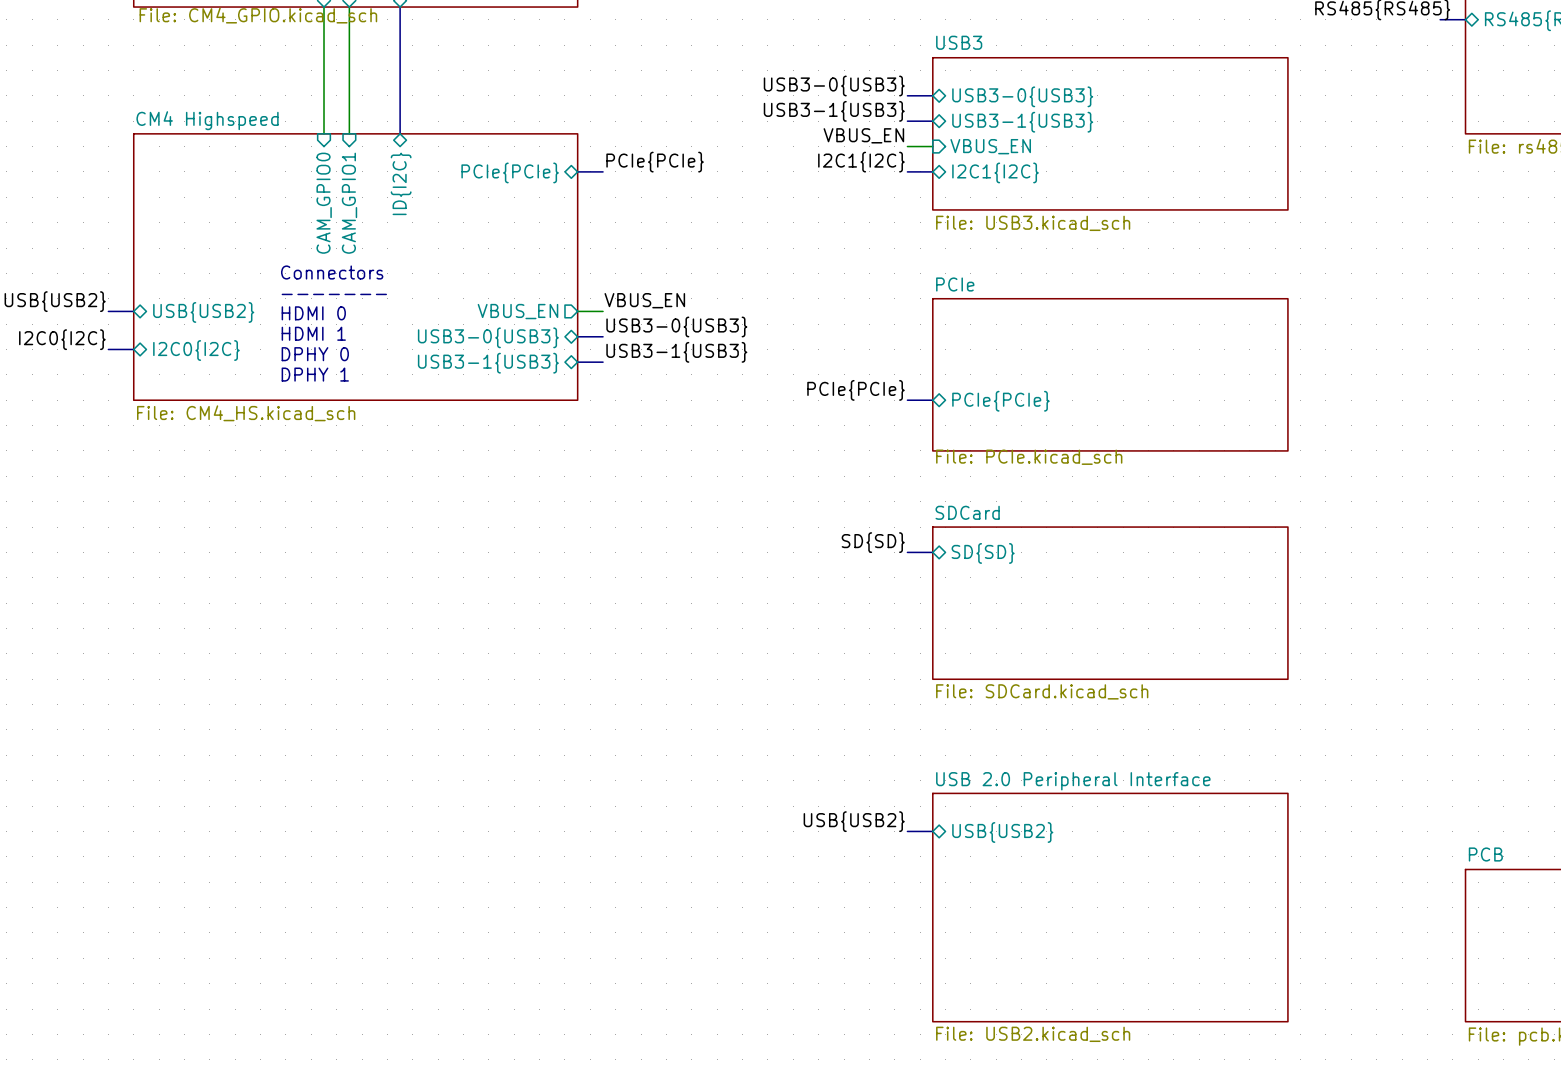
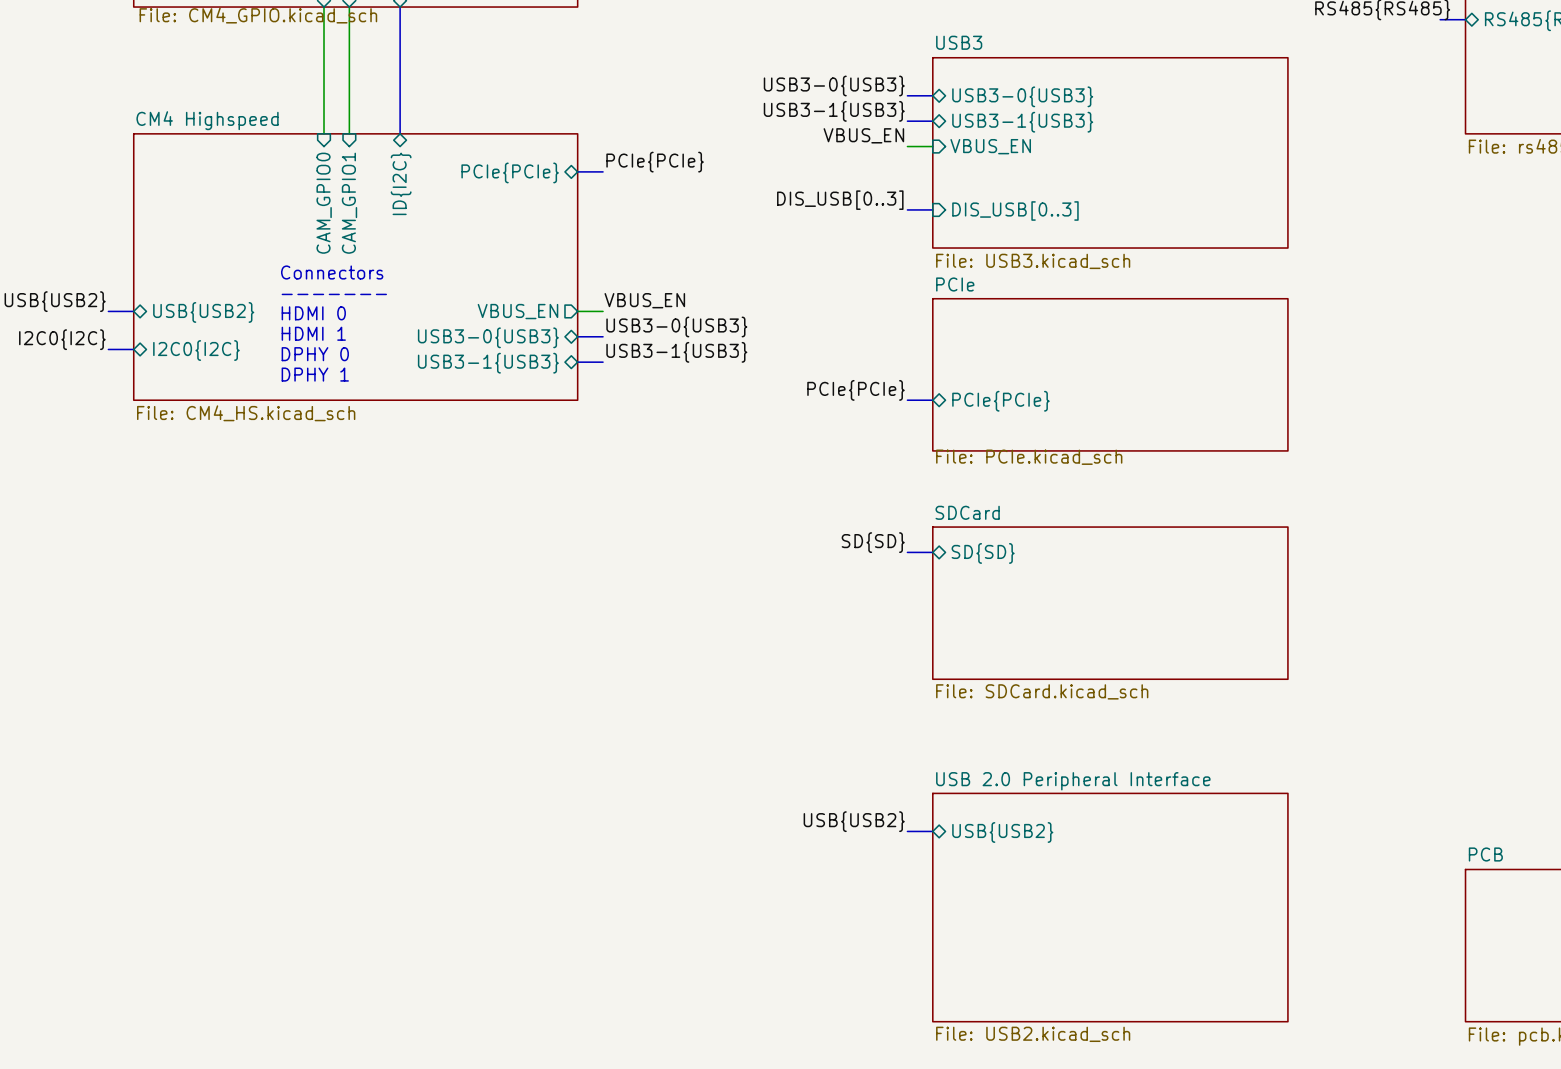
sheet USB3 shape: [932, 56, 1289, 211] -> [932, 56, 1289, 249]
label: I2C1{I2C} (861, 162) -> none
bus: (907, 171) (932, 171) -> (907, 209) (932, 209)
sheet pin: I2C1{I2C} (995, 172) -> none
label: none -> DIS_USB[0..3] (840, 200)
sheet pin: none -> DIS_USB[0..3] (1015, 210)

